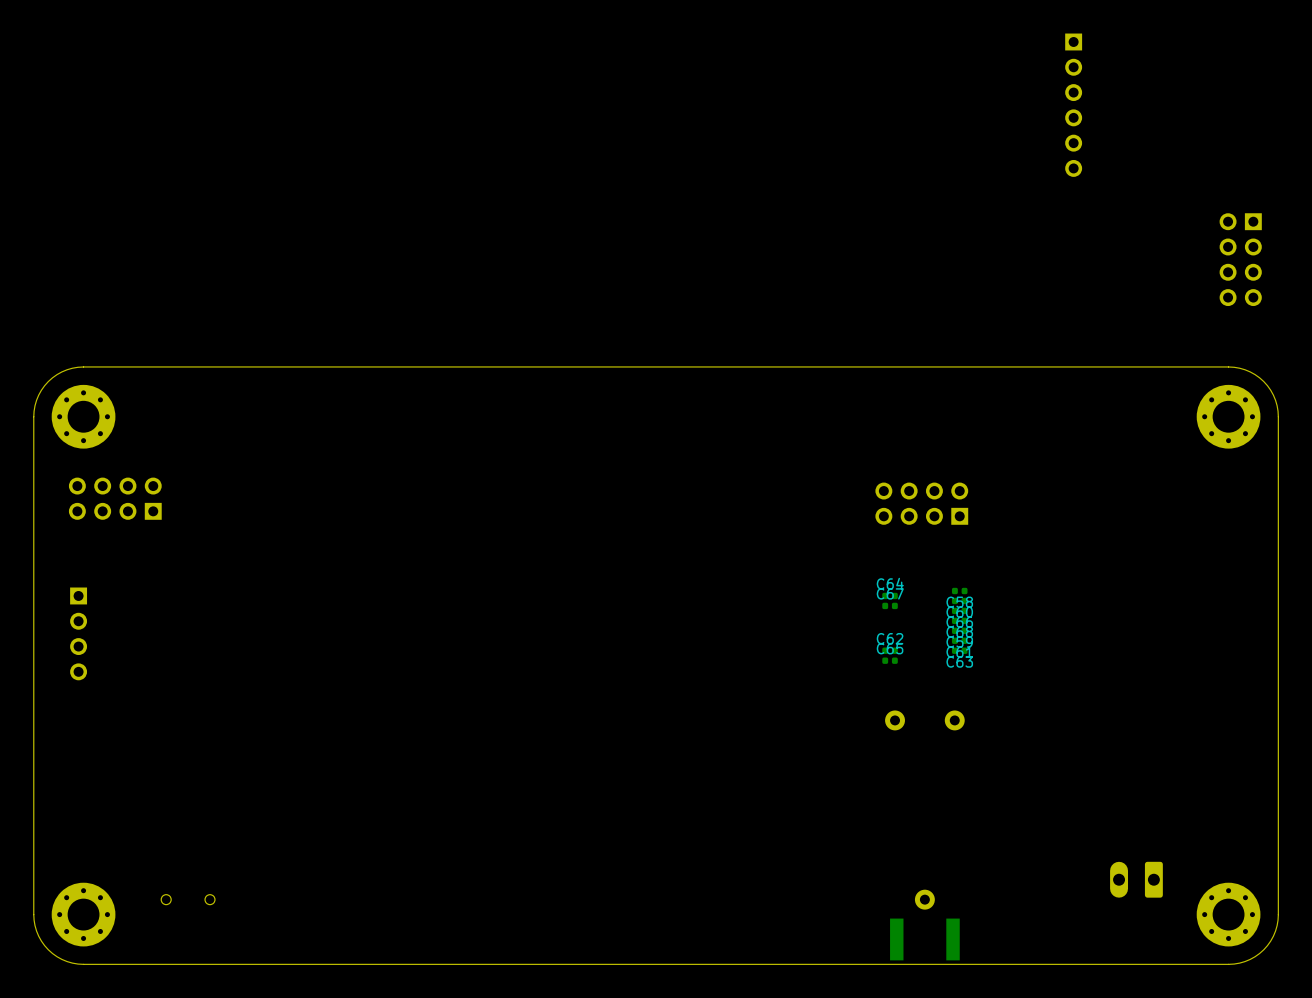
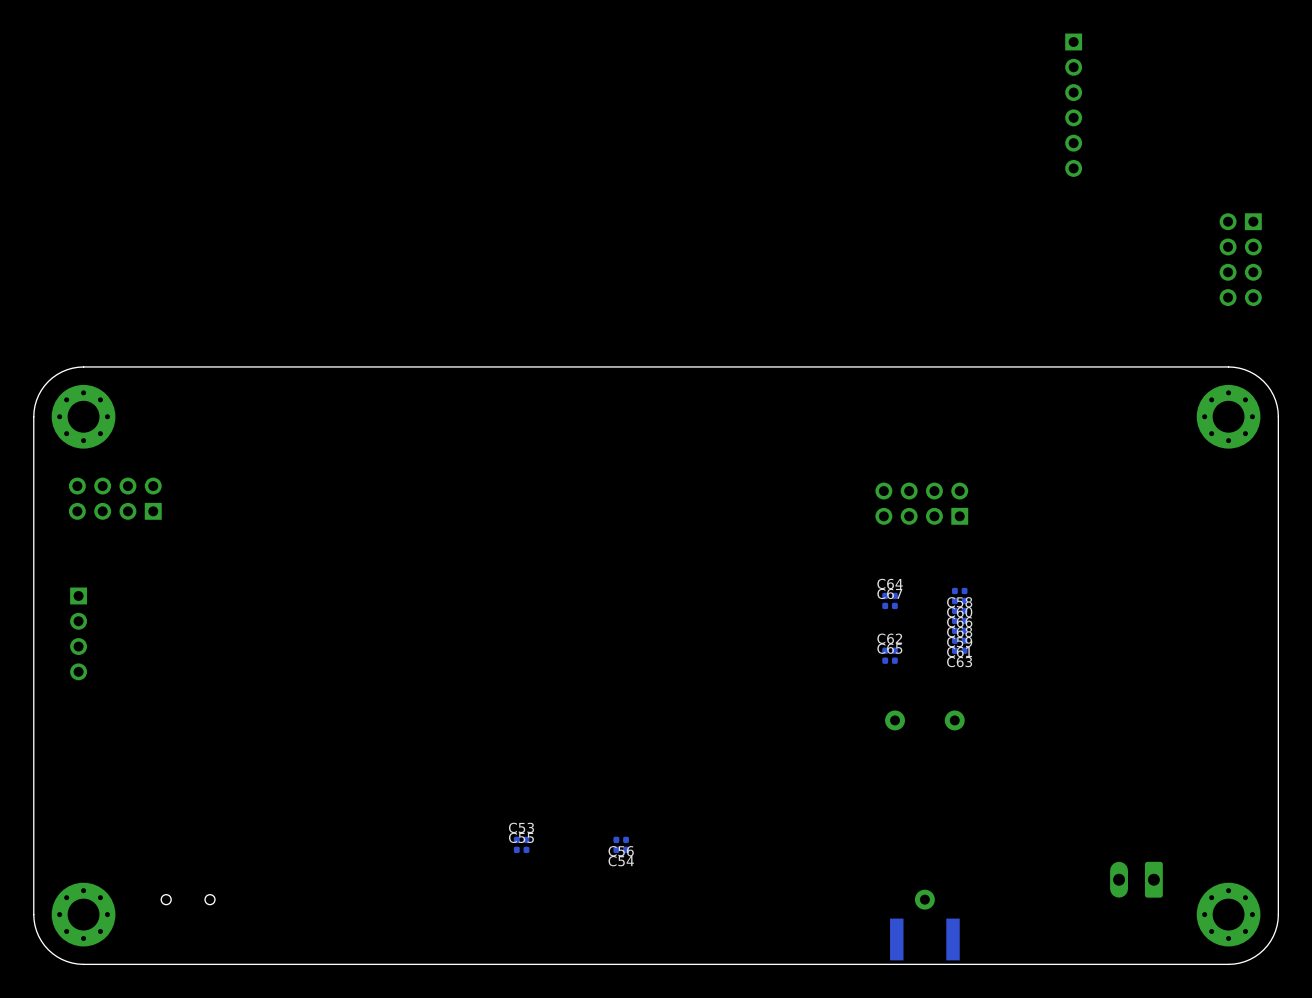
C53: none -> (521, 839)
C56: none -> (621, 839)
C55: none -> (521, 849)
C54: none -> (621, 849)

